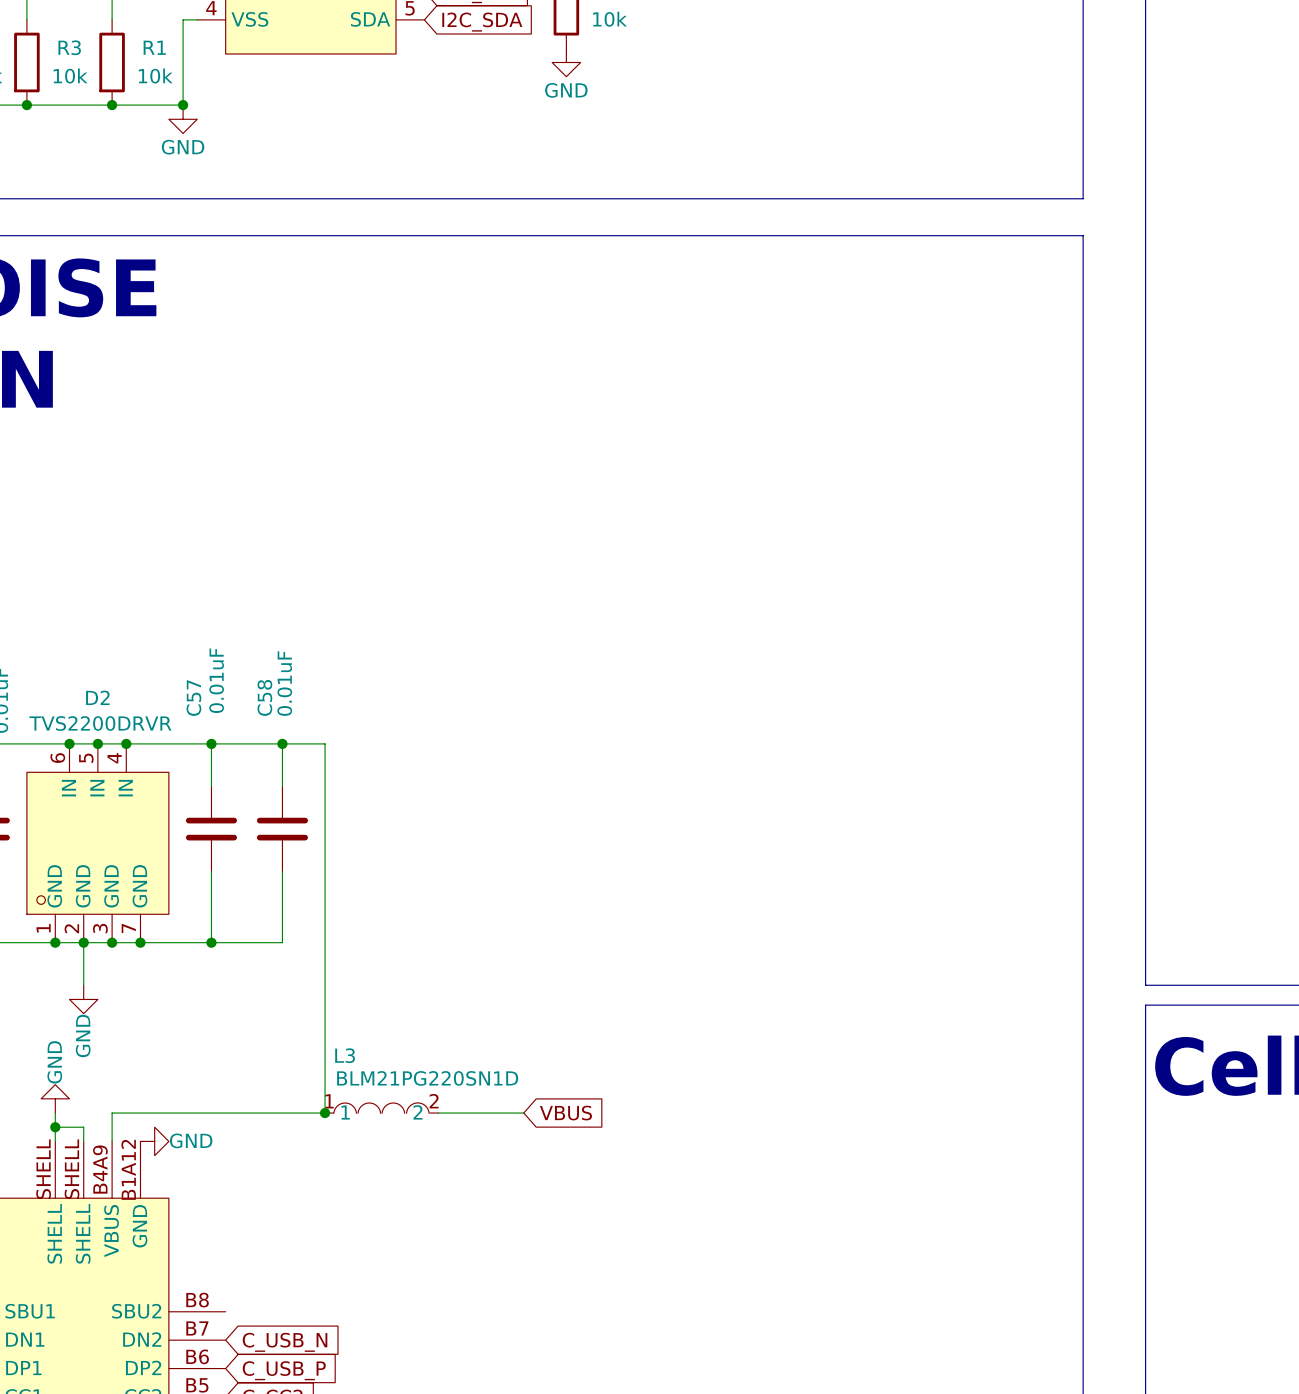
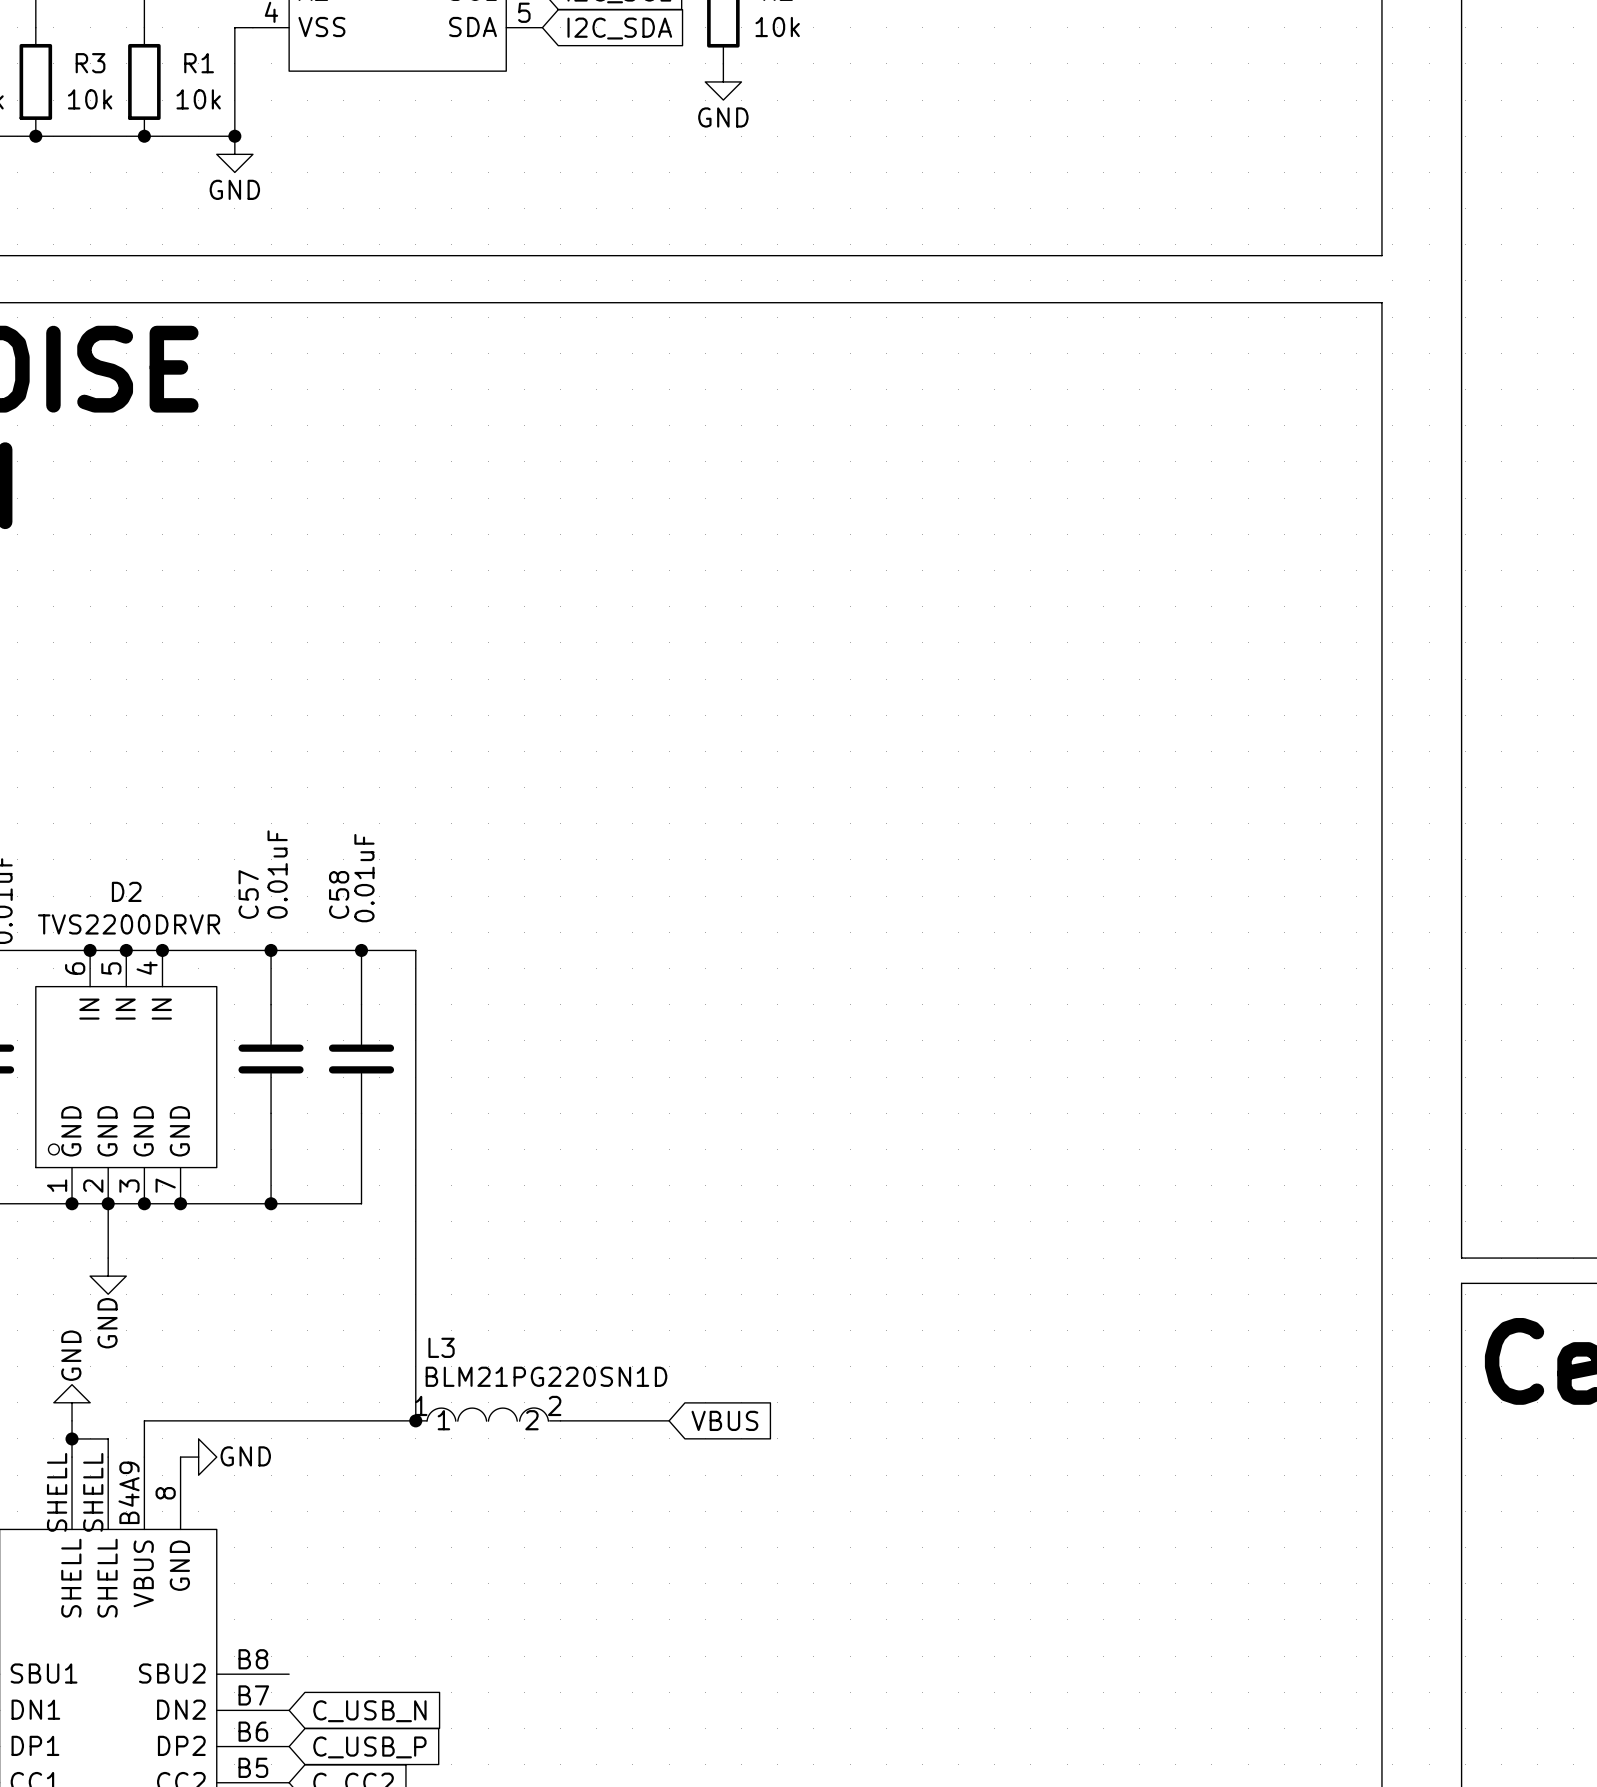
part pin number: B1A12 (128, 1169) -> 8 (165, 1493)

